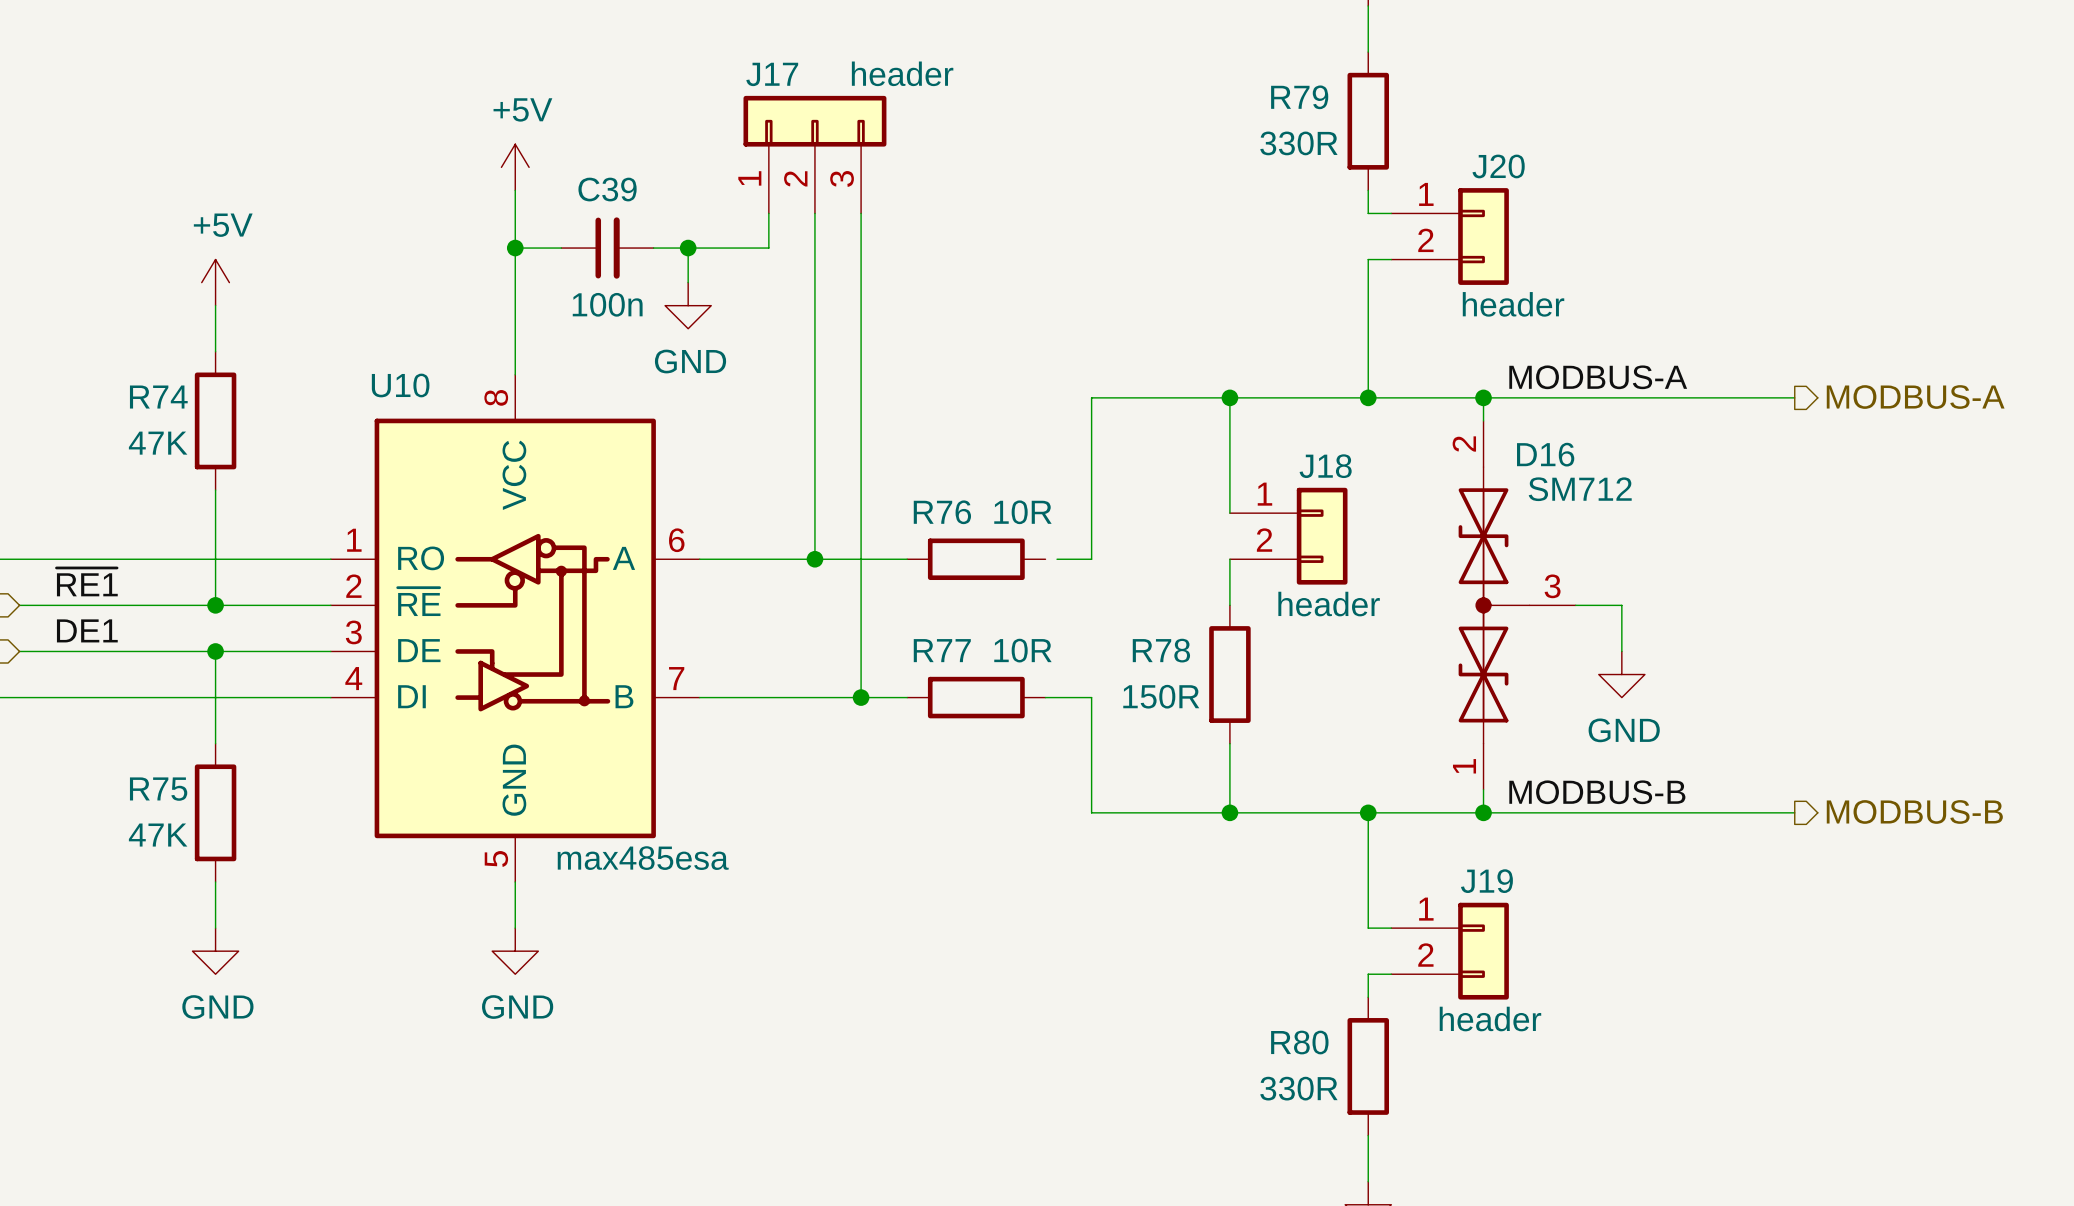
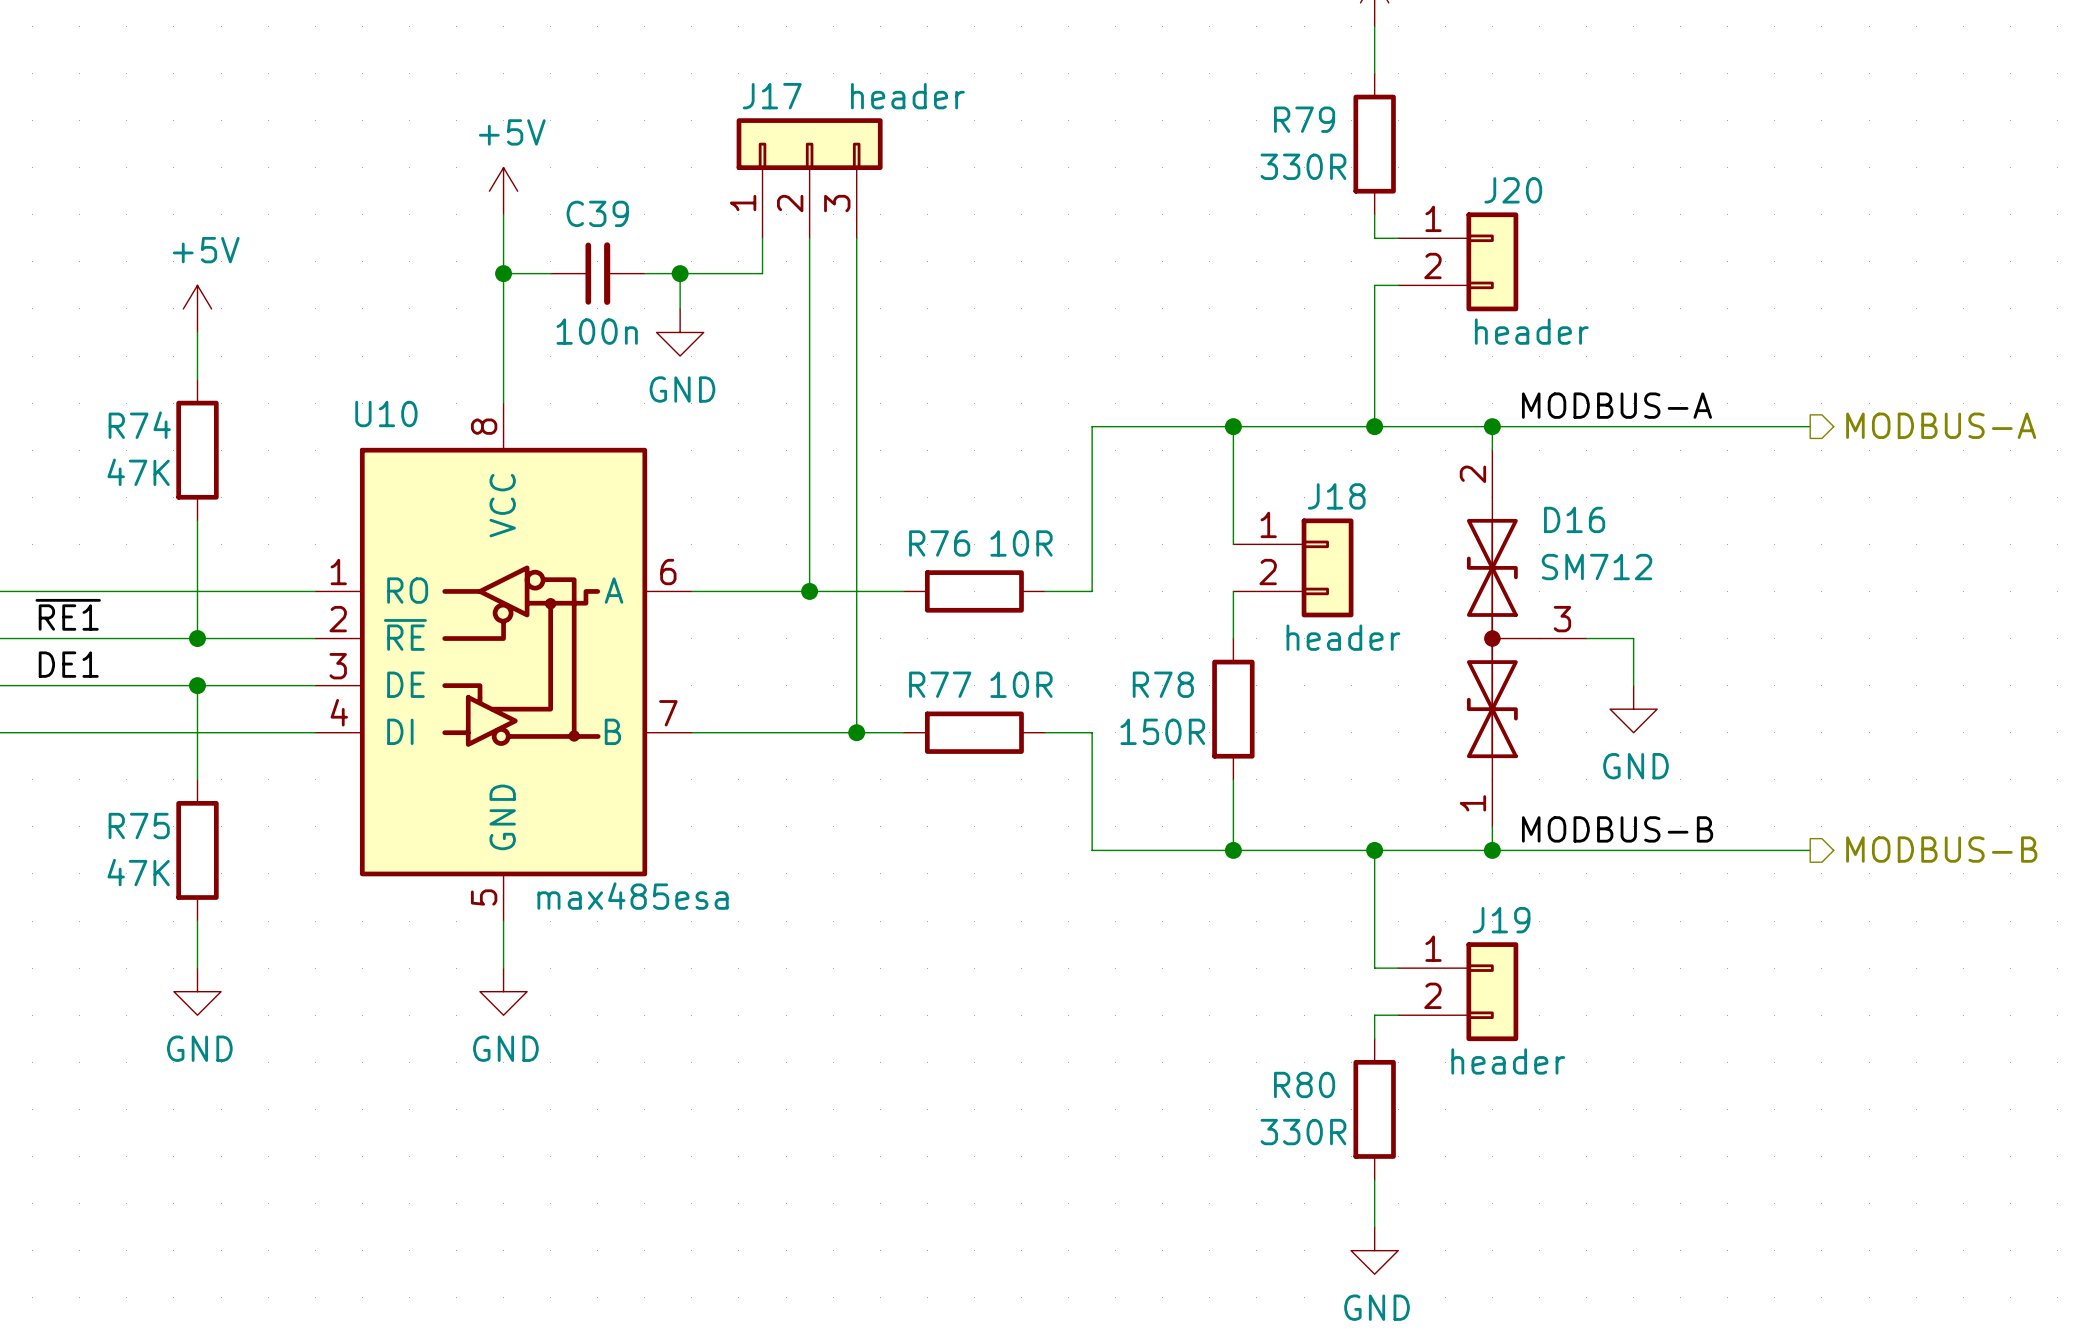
D16 name position: D16 (1545, 454) -> D16 (1574, 519)
D16 value position: SM712 (1580, 489) -> SM712 (1597, 567)
wire: none -> (1045, 591) (1056, 591)

